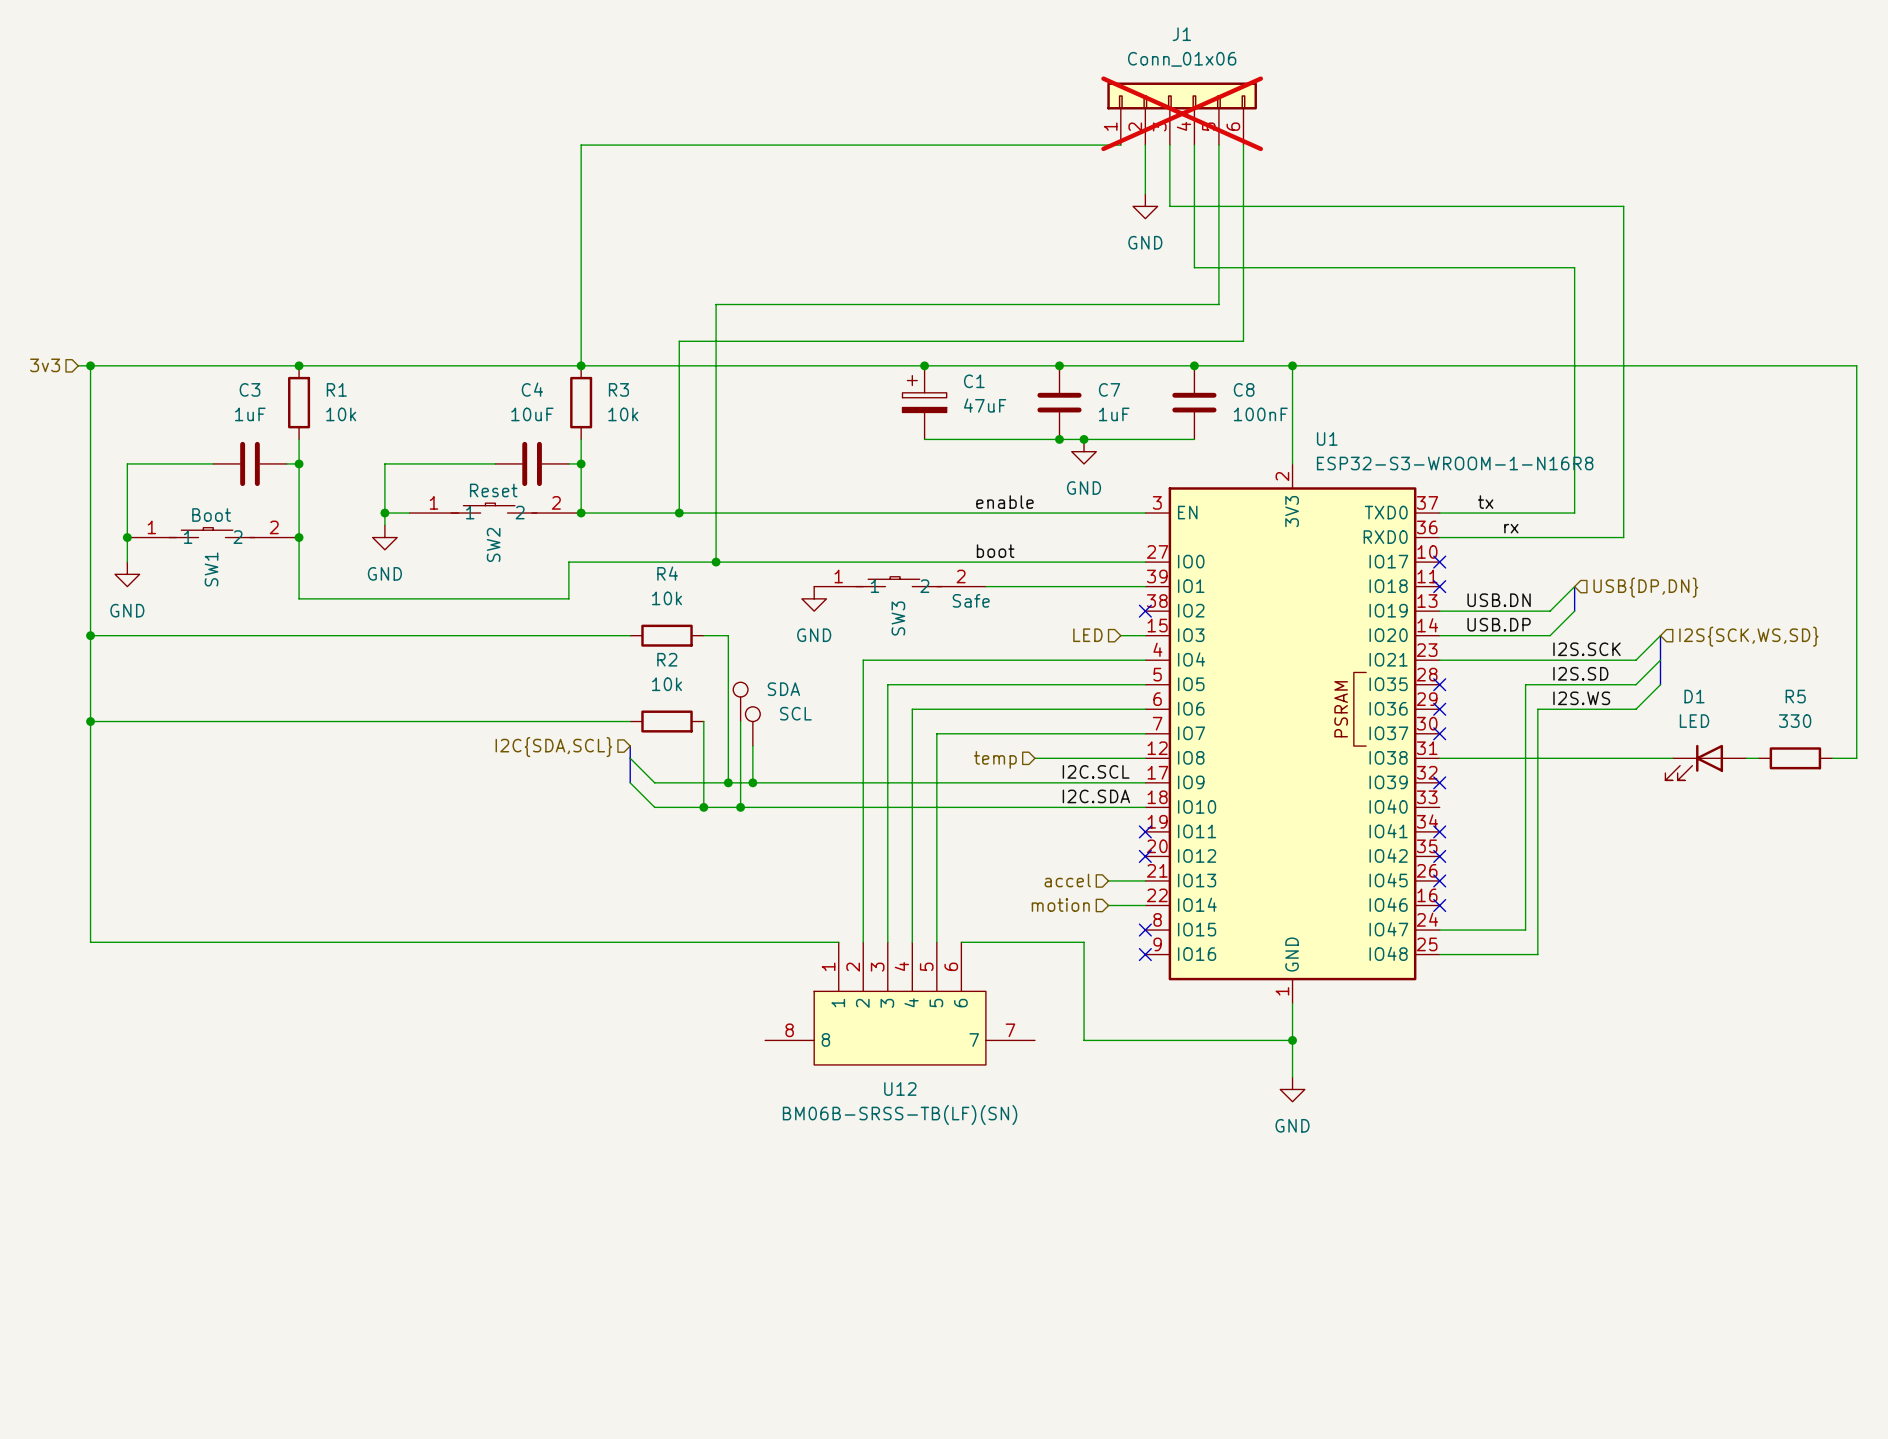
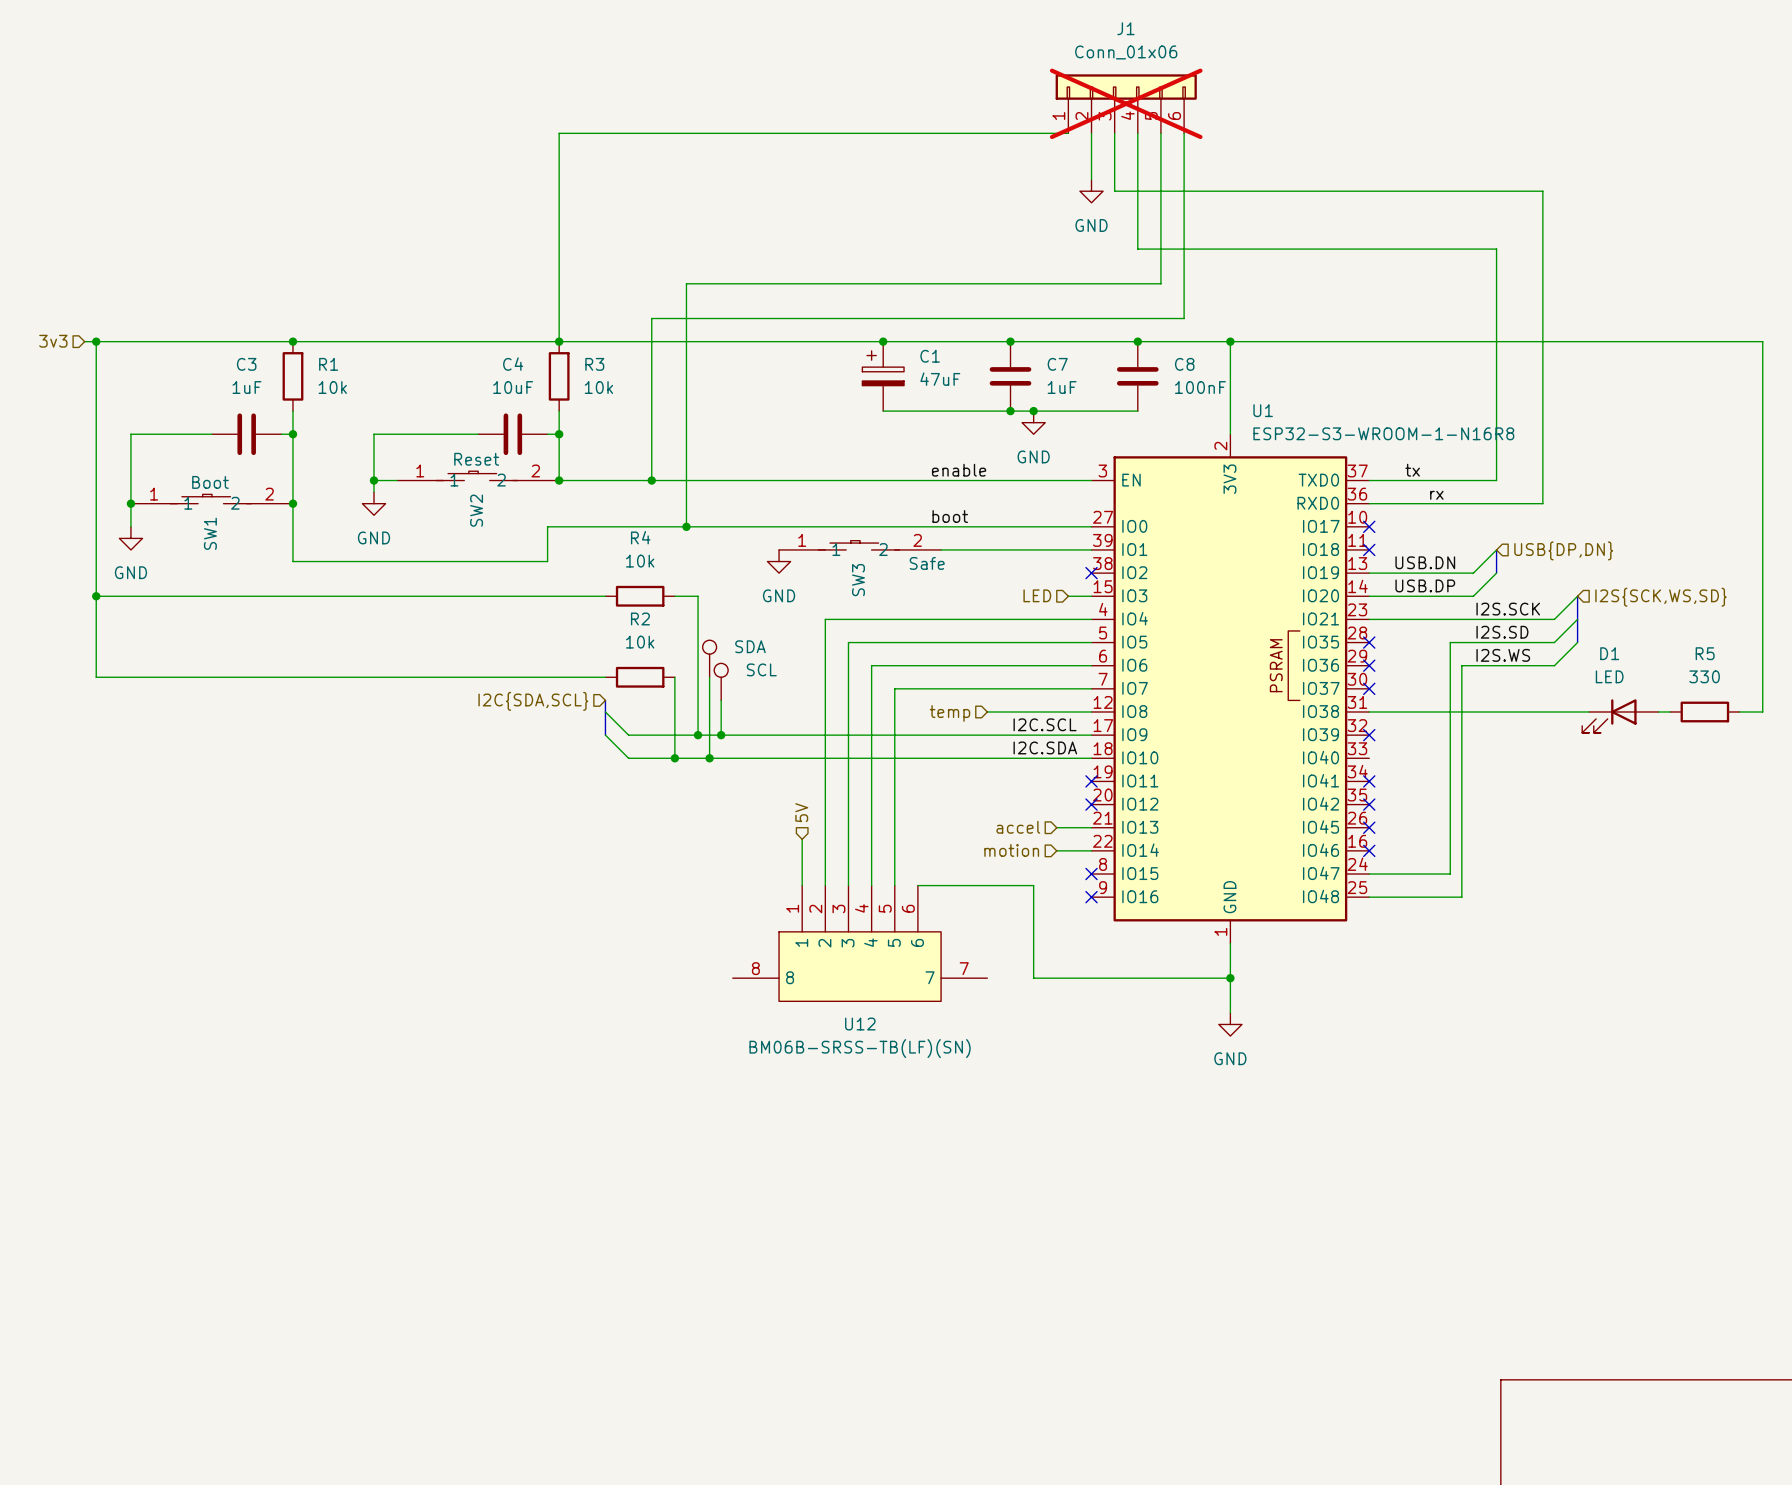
wire: (90, 721) (90, 942) (838, 942) -> (802, 839) (802, 885)
junction: (90, 721) -> none
hierarchical label: none -> 5V (801, 812)

